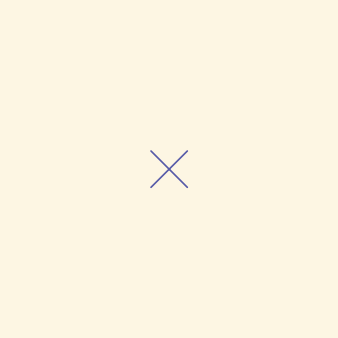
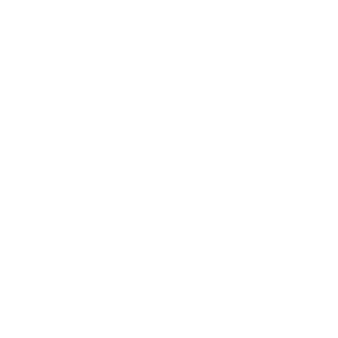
no-connect mark: (169, 169) -> none

